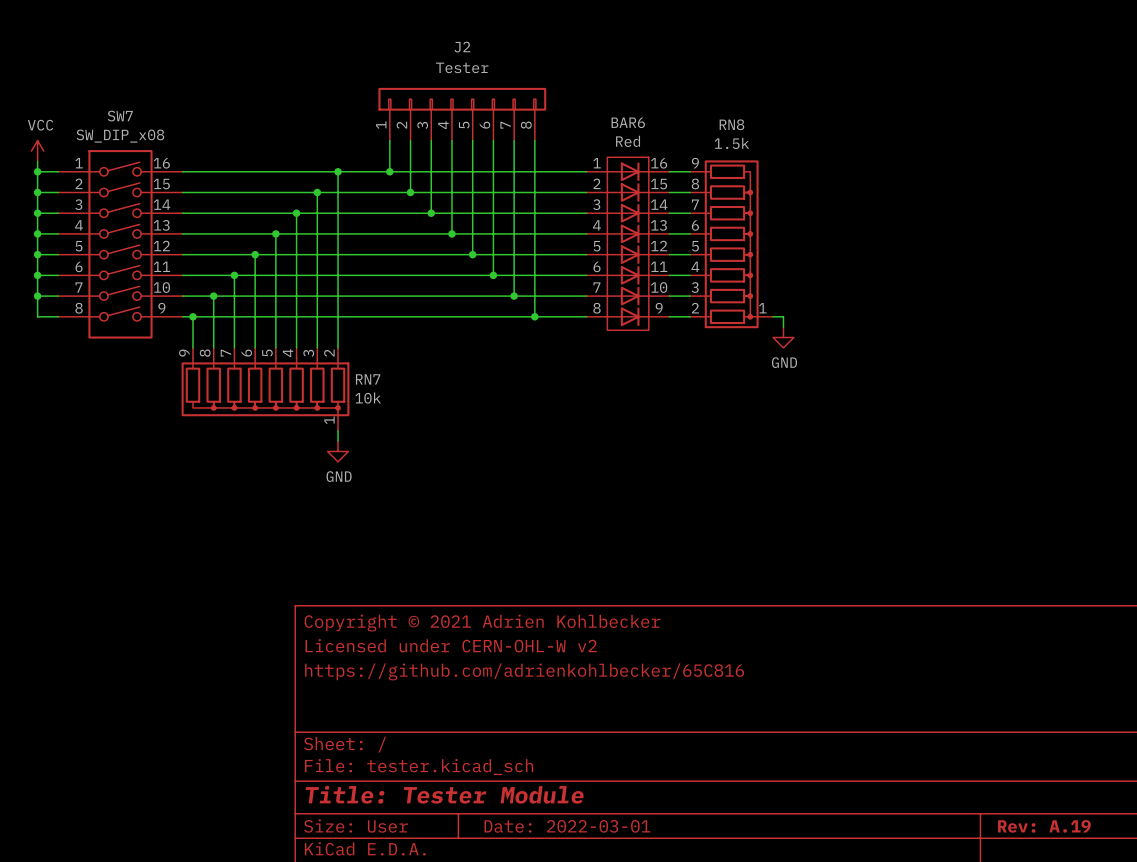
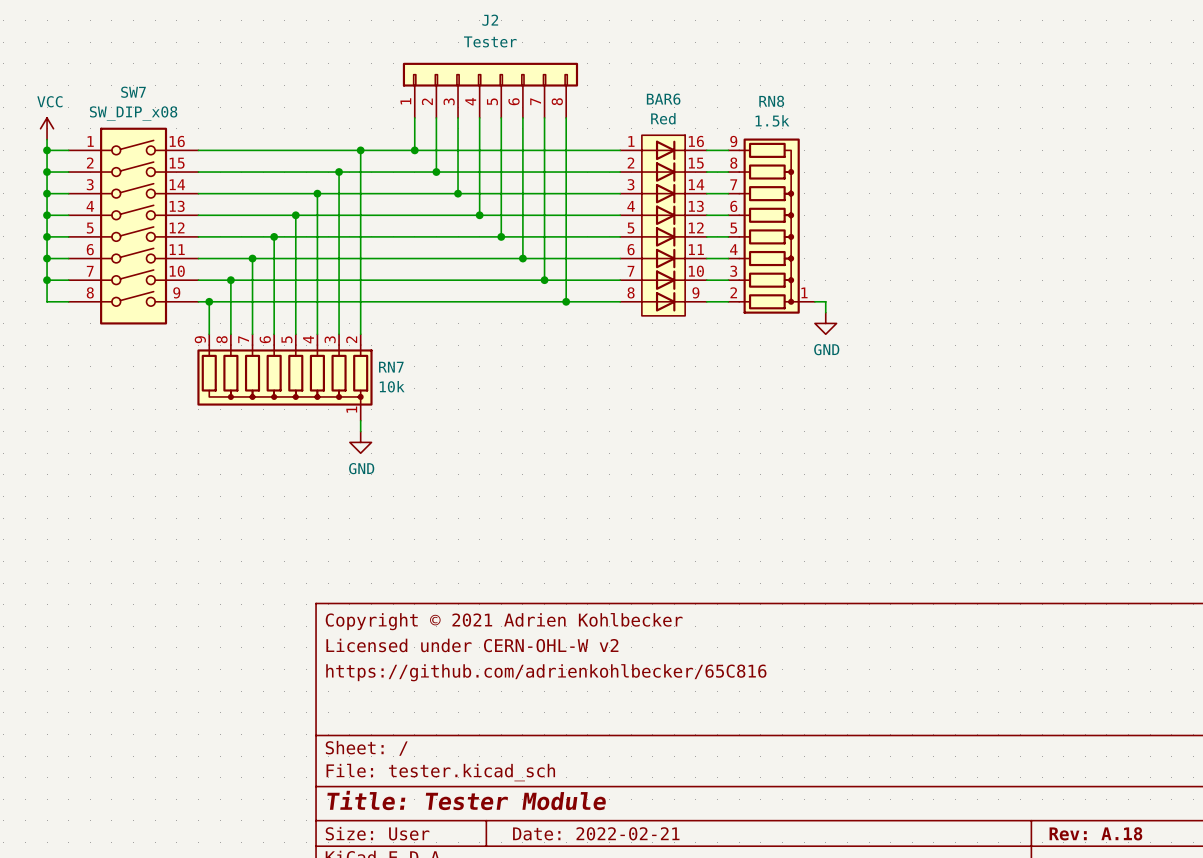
title block: Date: 2022-03-01 (567, 826) -> Date: 2022-02-21 (596, 833)
title block: Rev: A.19 (1044, 826) -> Rev: A.18 (1095, 833)

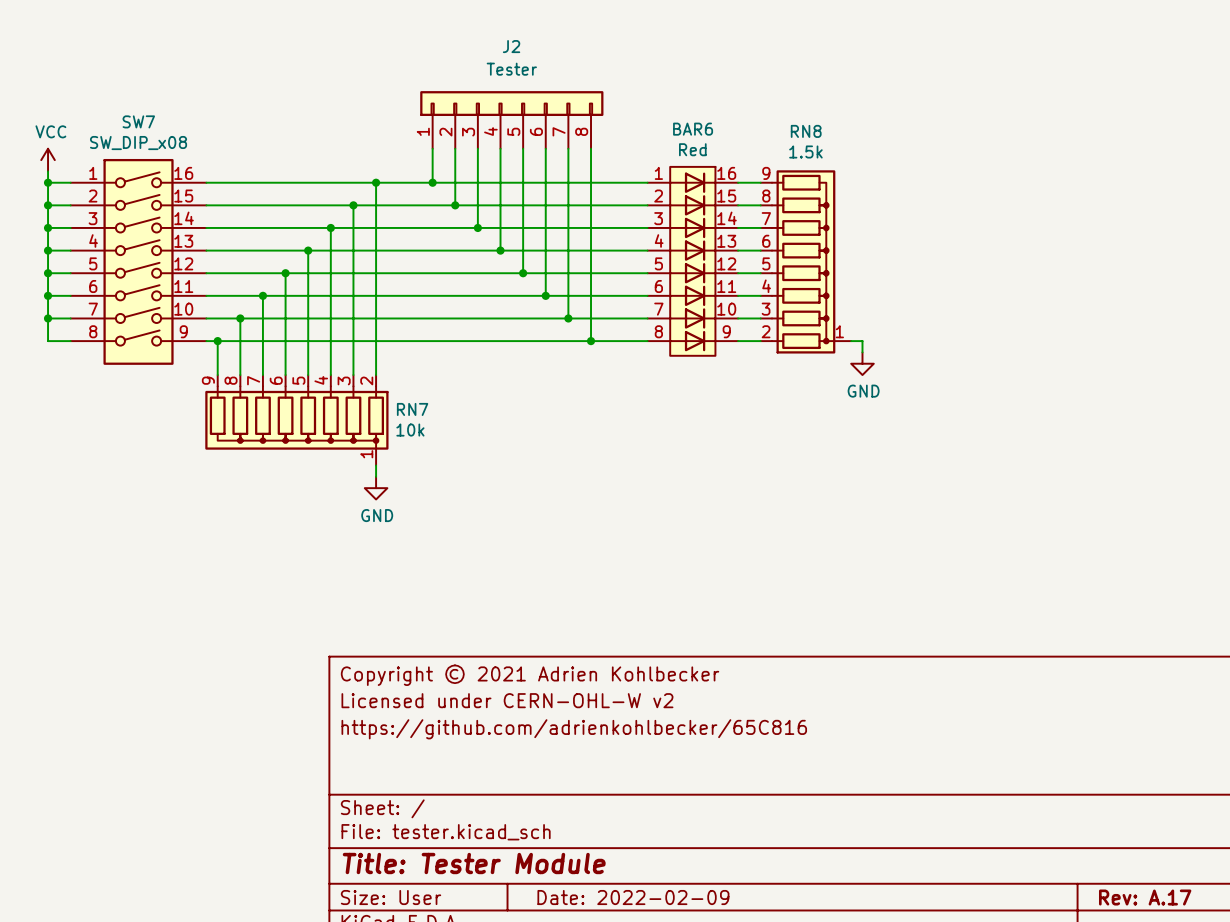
title block: Date: 2022-02-21 (596, 833) -> Date: 2022-02-09 (633, 897)
title block: Rev: A.18 (1095, 833) -> Rev: A.17 (1145, 897)

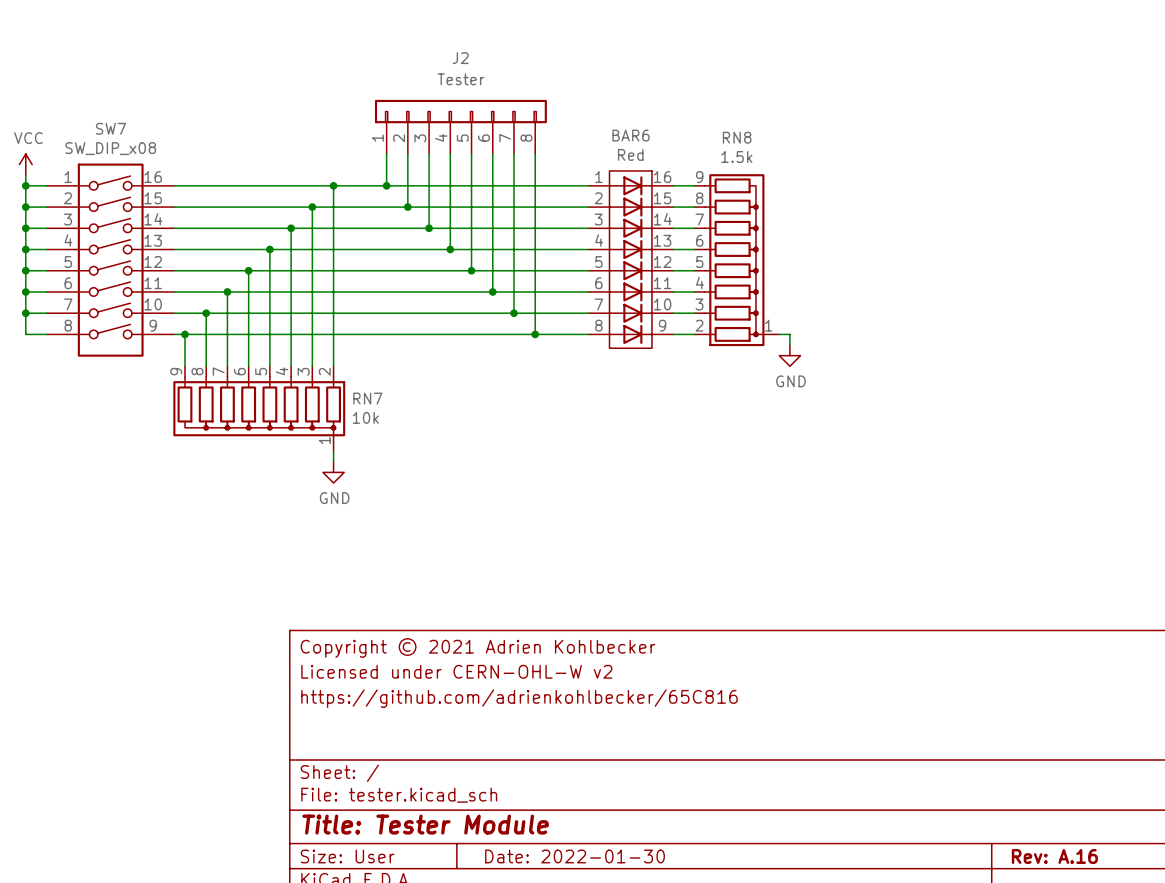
title block: Date: 2022-02-09 (633, 897) -> Date: 2022-01-30 (575, 856)
title block: Rev: A.17 (1145, 897) -> Rev: A.16 (1054, 856)

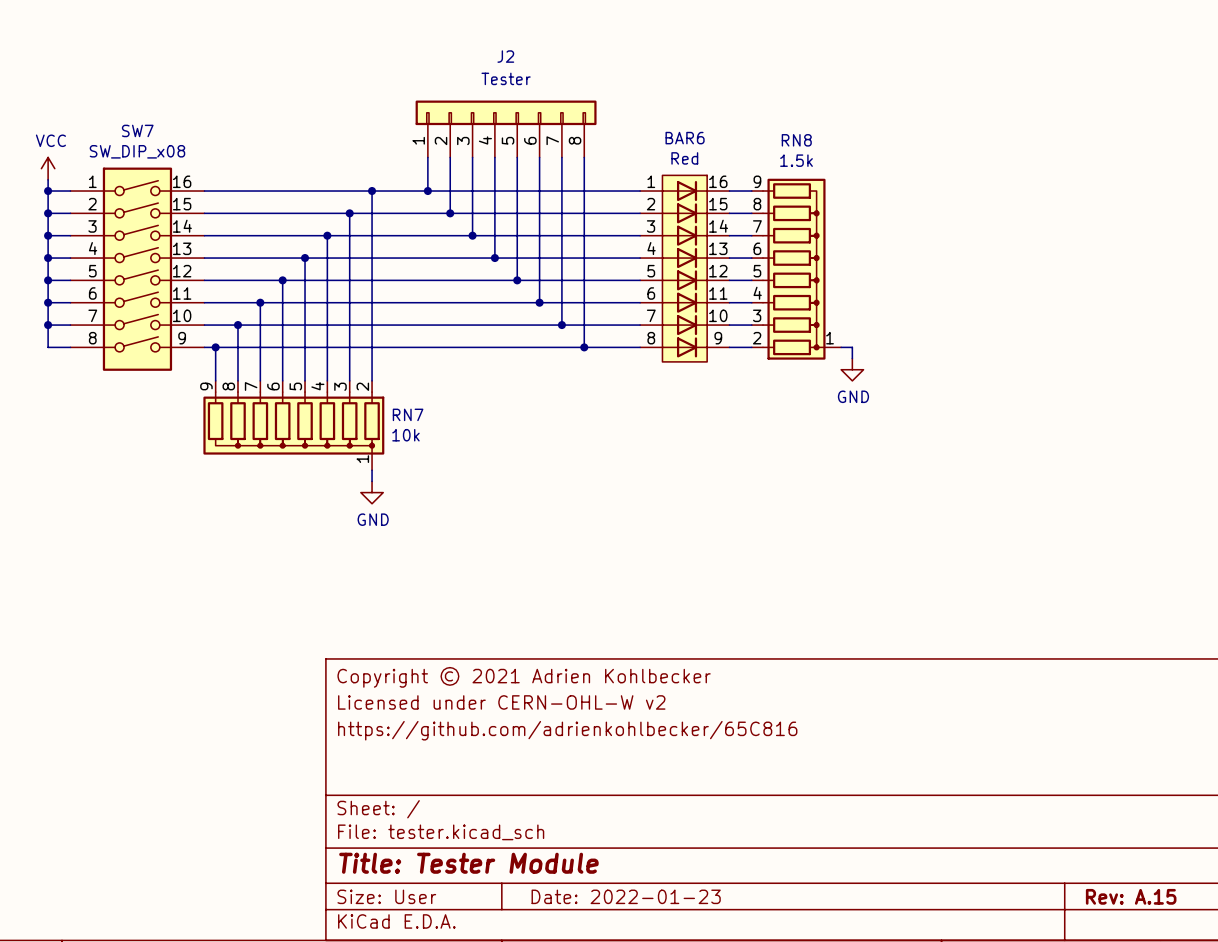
title block: Date: 2022-01-30 (575, 856) -> Date: 2022-01-23 (626, 896)
title block: Rev: A.16 (1054, 856) -> Rev: A.15 (1131, 896)

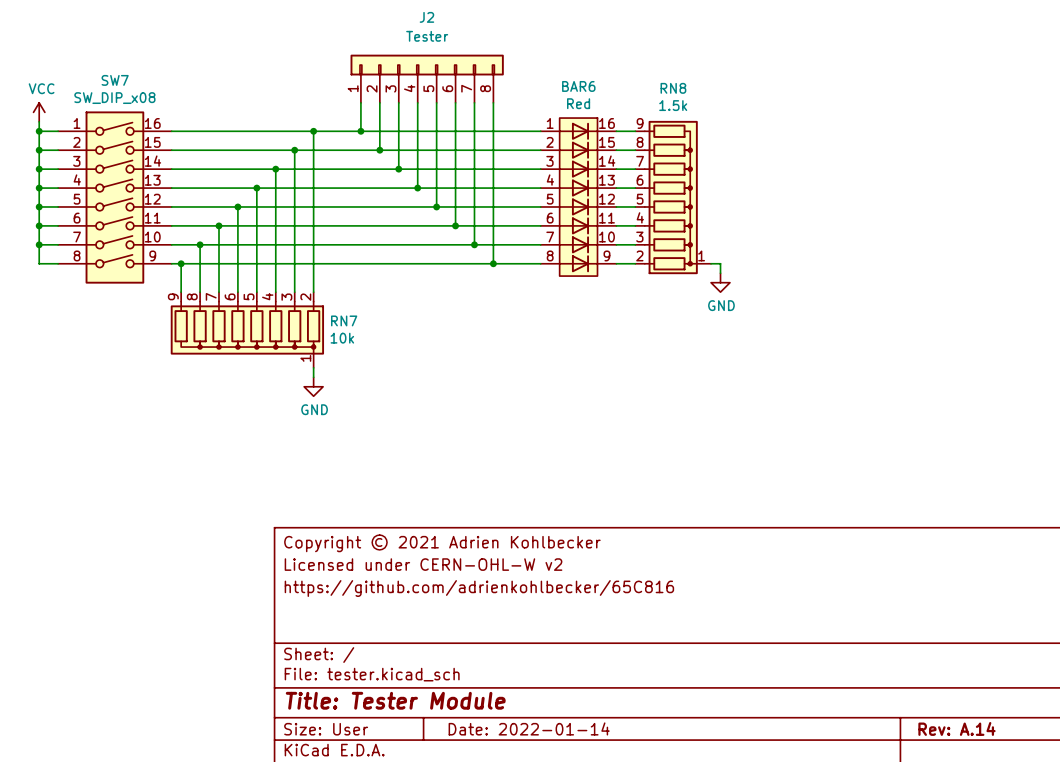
title block: Date: 2022-01-23 (626, 896) -> Date: 2022-01-14 (529, 728)
title block: Rev: A.15 (1131, 896) -> Rev: A.14 (956, 728)

